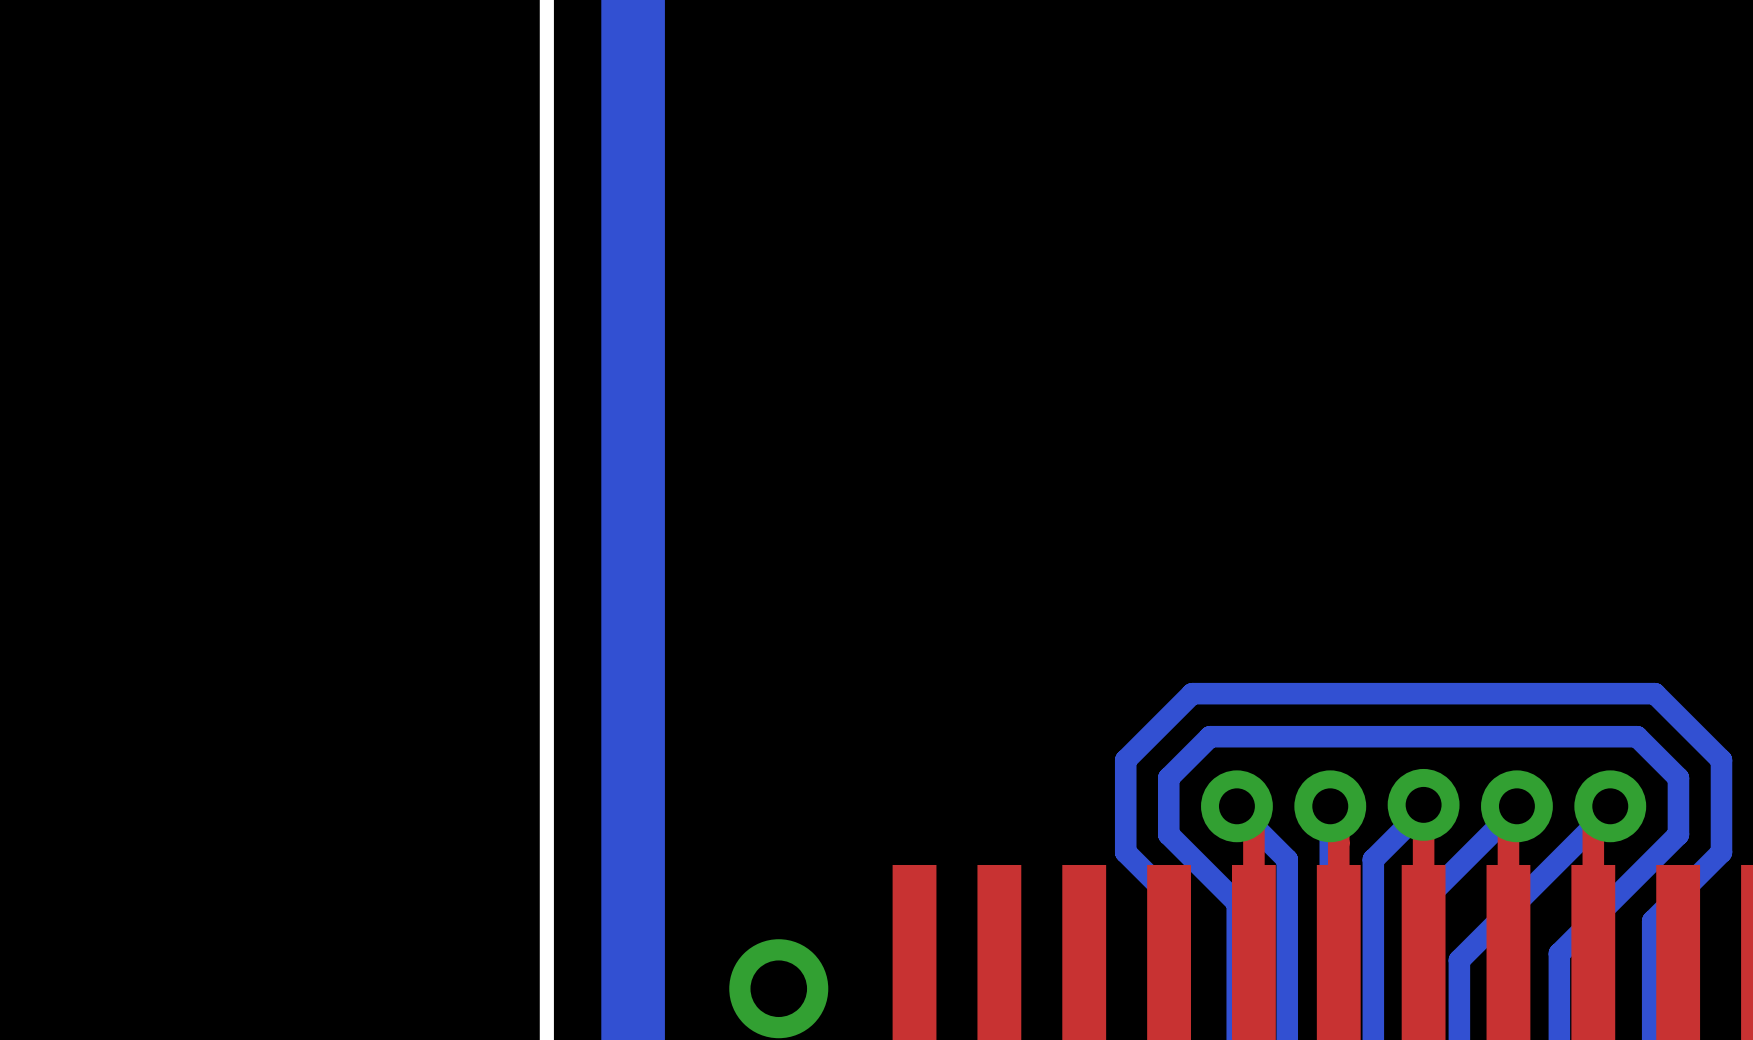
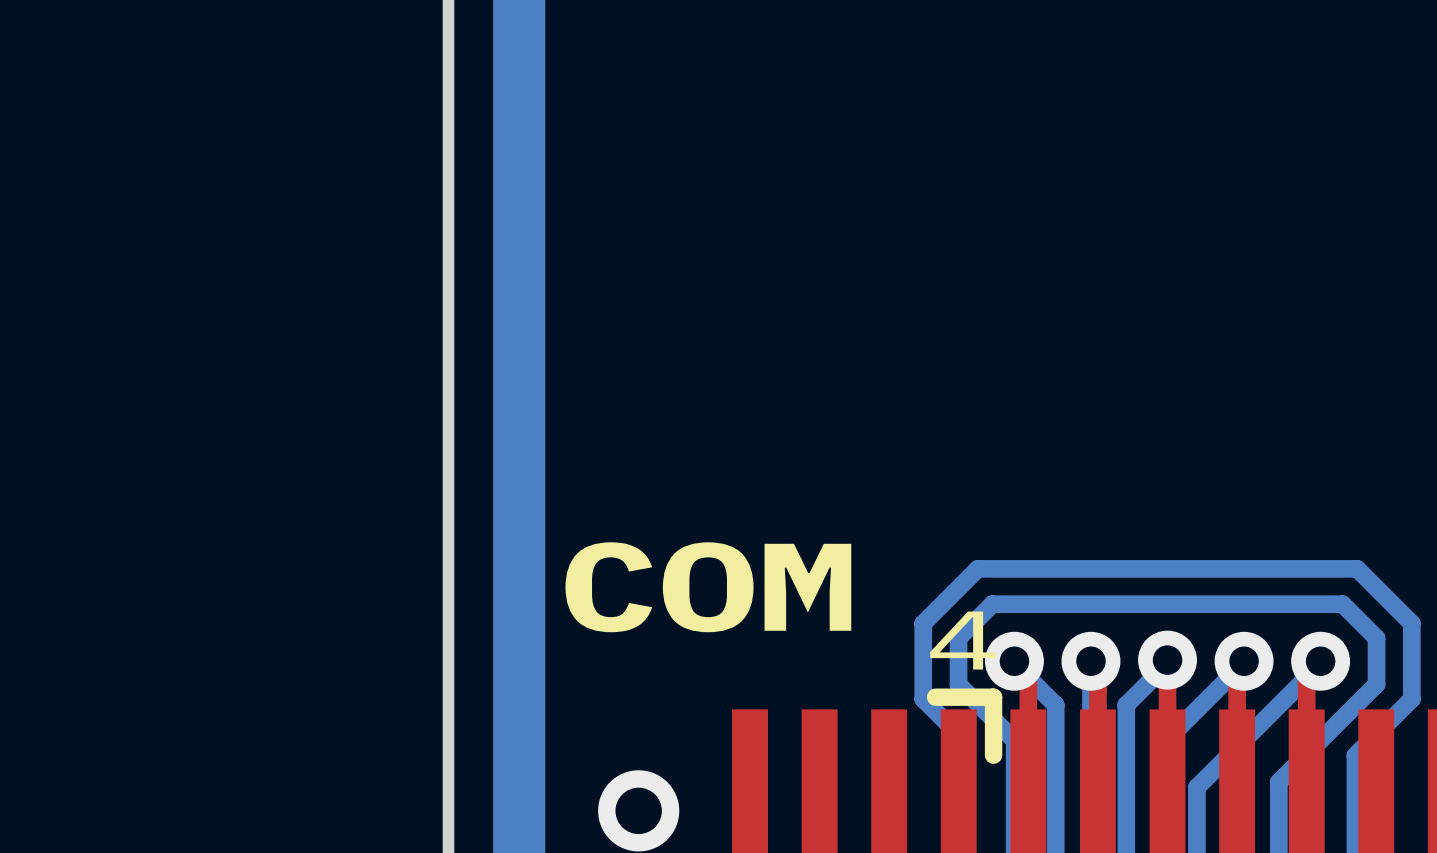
text: none -> COM (708, 587)
text: none -> 4 (963, 640)
line: none -> (935, 697) (993, 697) (993, 755)

